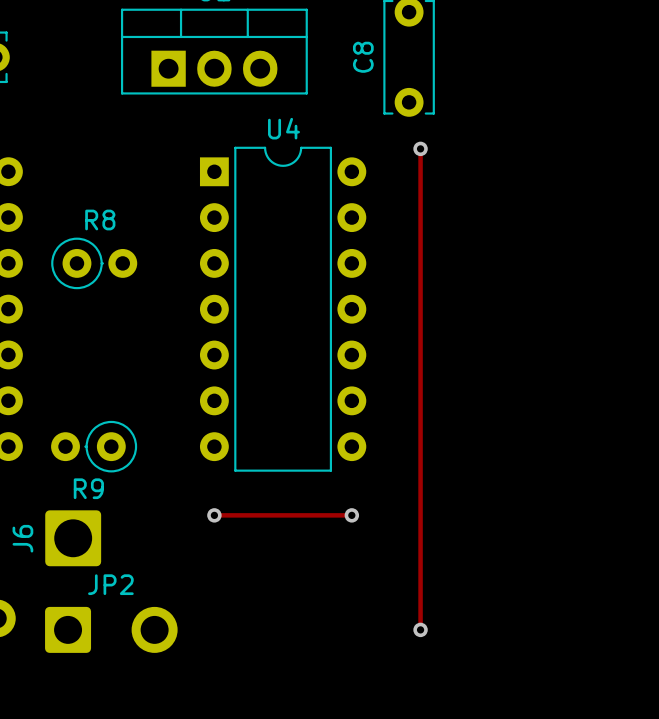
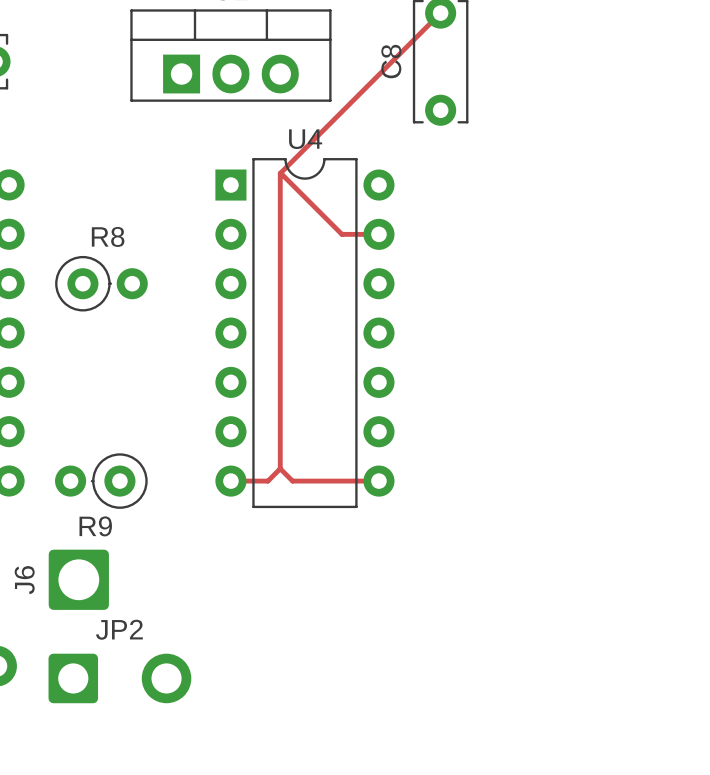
track: none -> (440, 13) (280, 173) (280, 468)
track: (420, 148) (420, 629) -> none
via: (420, 148) -> none
track: none -> (280, 173) (341, 234) (378, 234)
track: none -> (280, 468) (267, 481) (230, 481)
track: none -> (280, 468) (292, 481) (378, 481)
track: (214, 515) (351, 515) -> none
via: (214, 515) -> none
via: (351, 515) -> none
via: (420, 629) -> none

